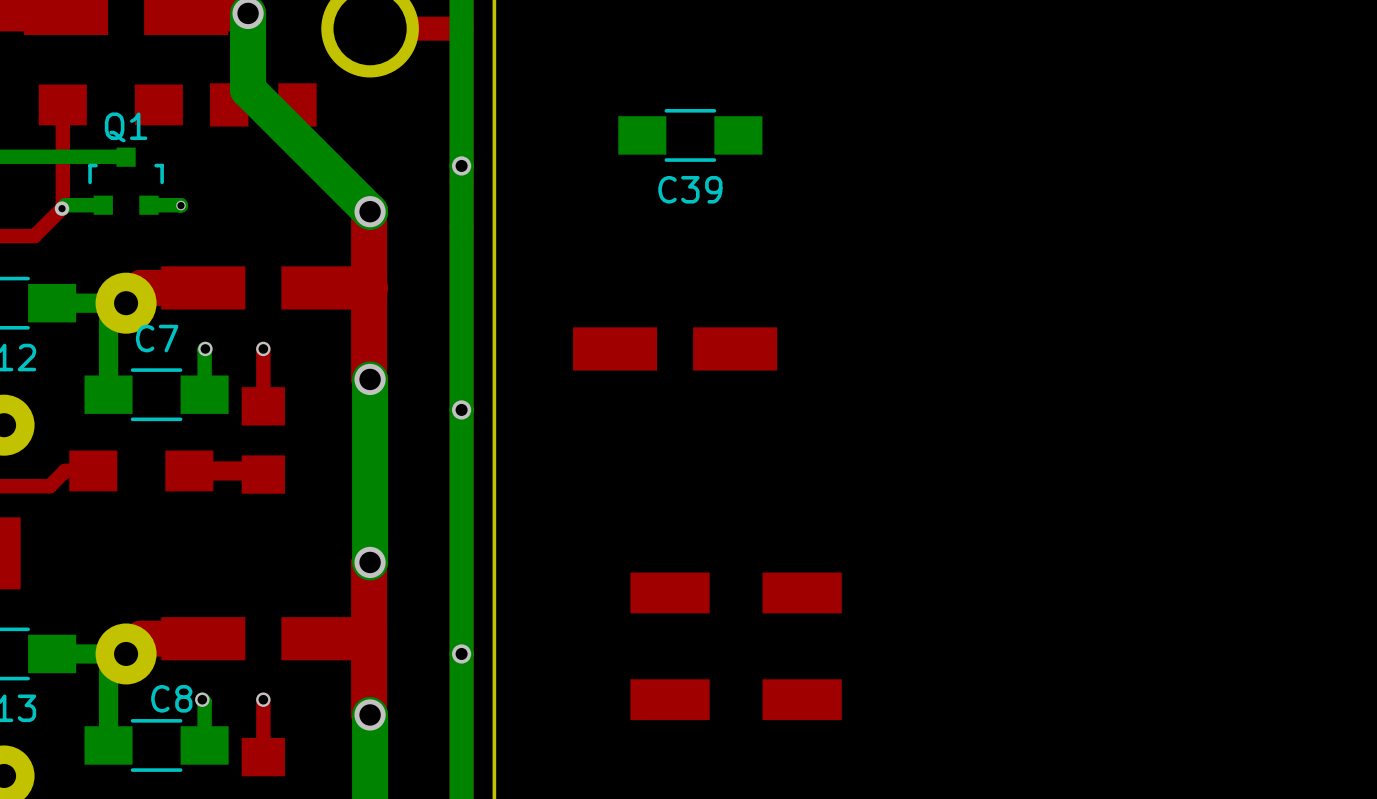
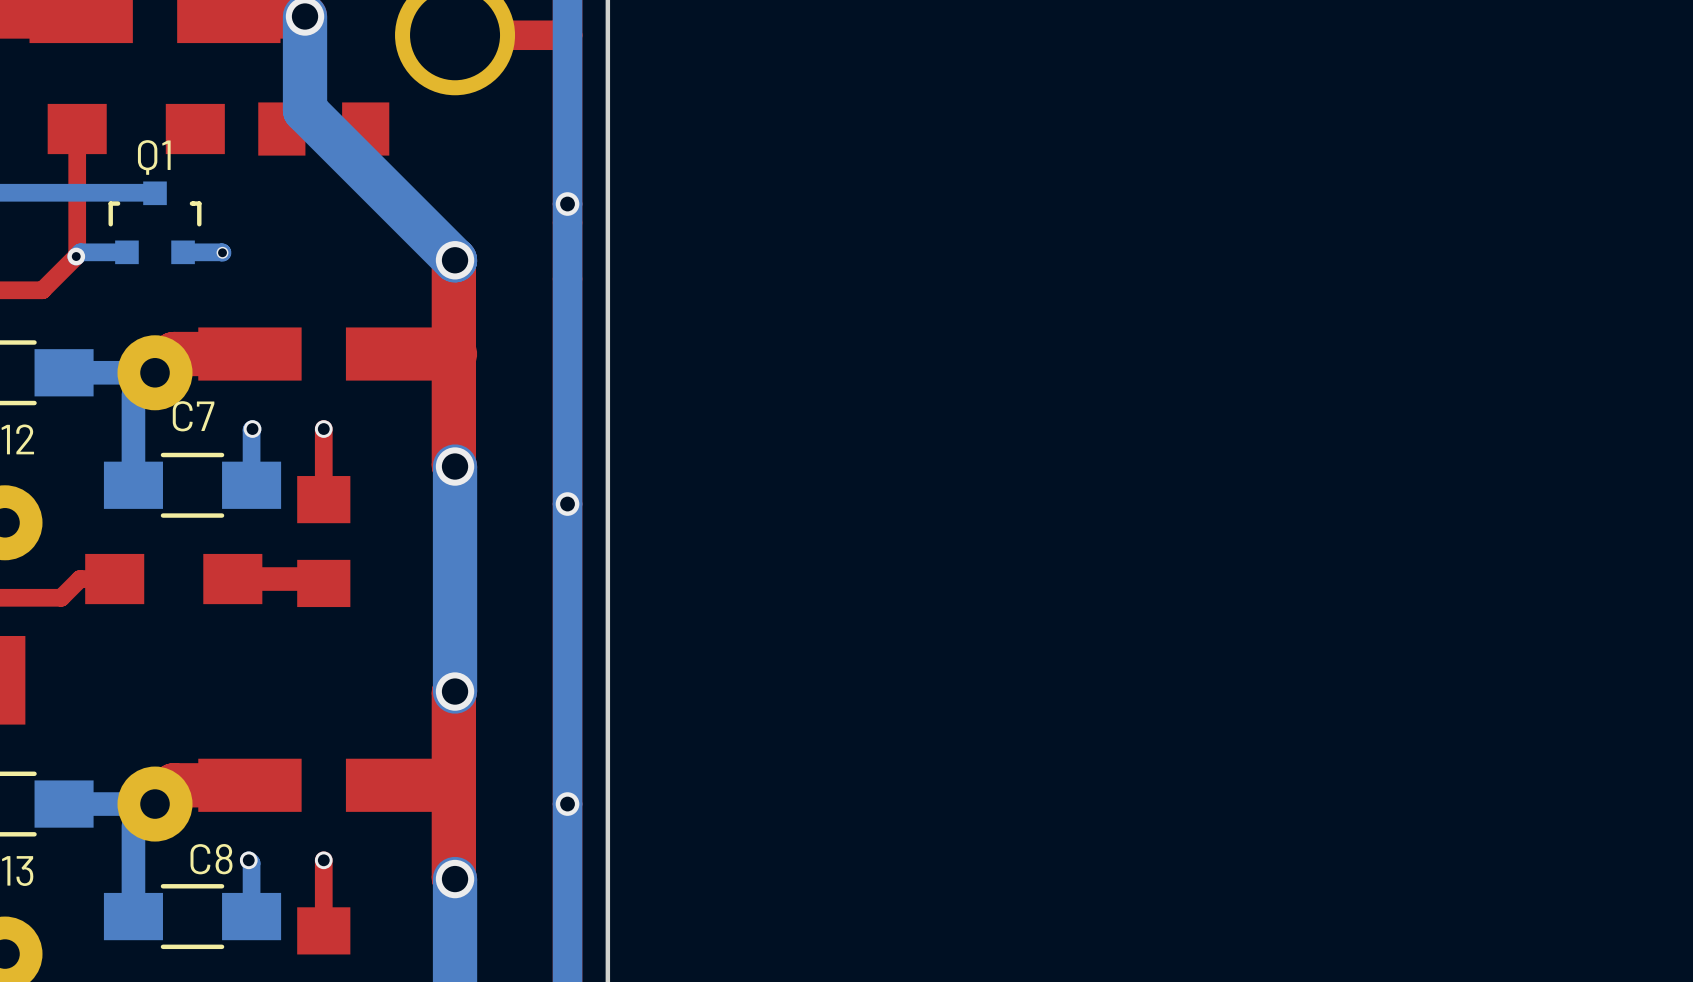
C39: (690, 135) -> none
part: (675, 348) -> none
part: (736, 592) -> none
part: (736, 699) -> none

